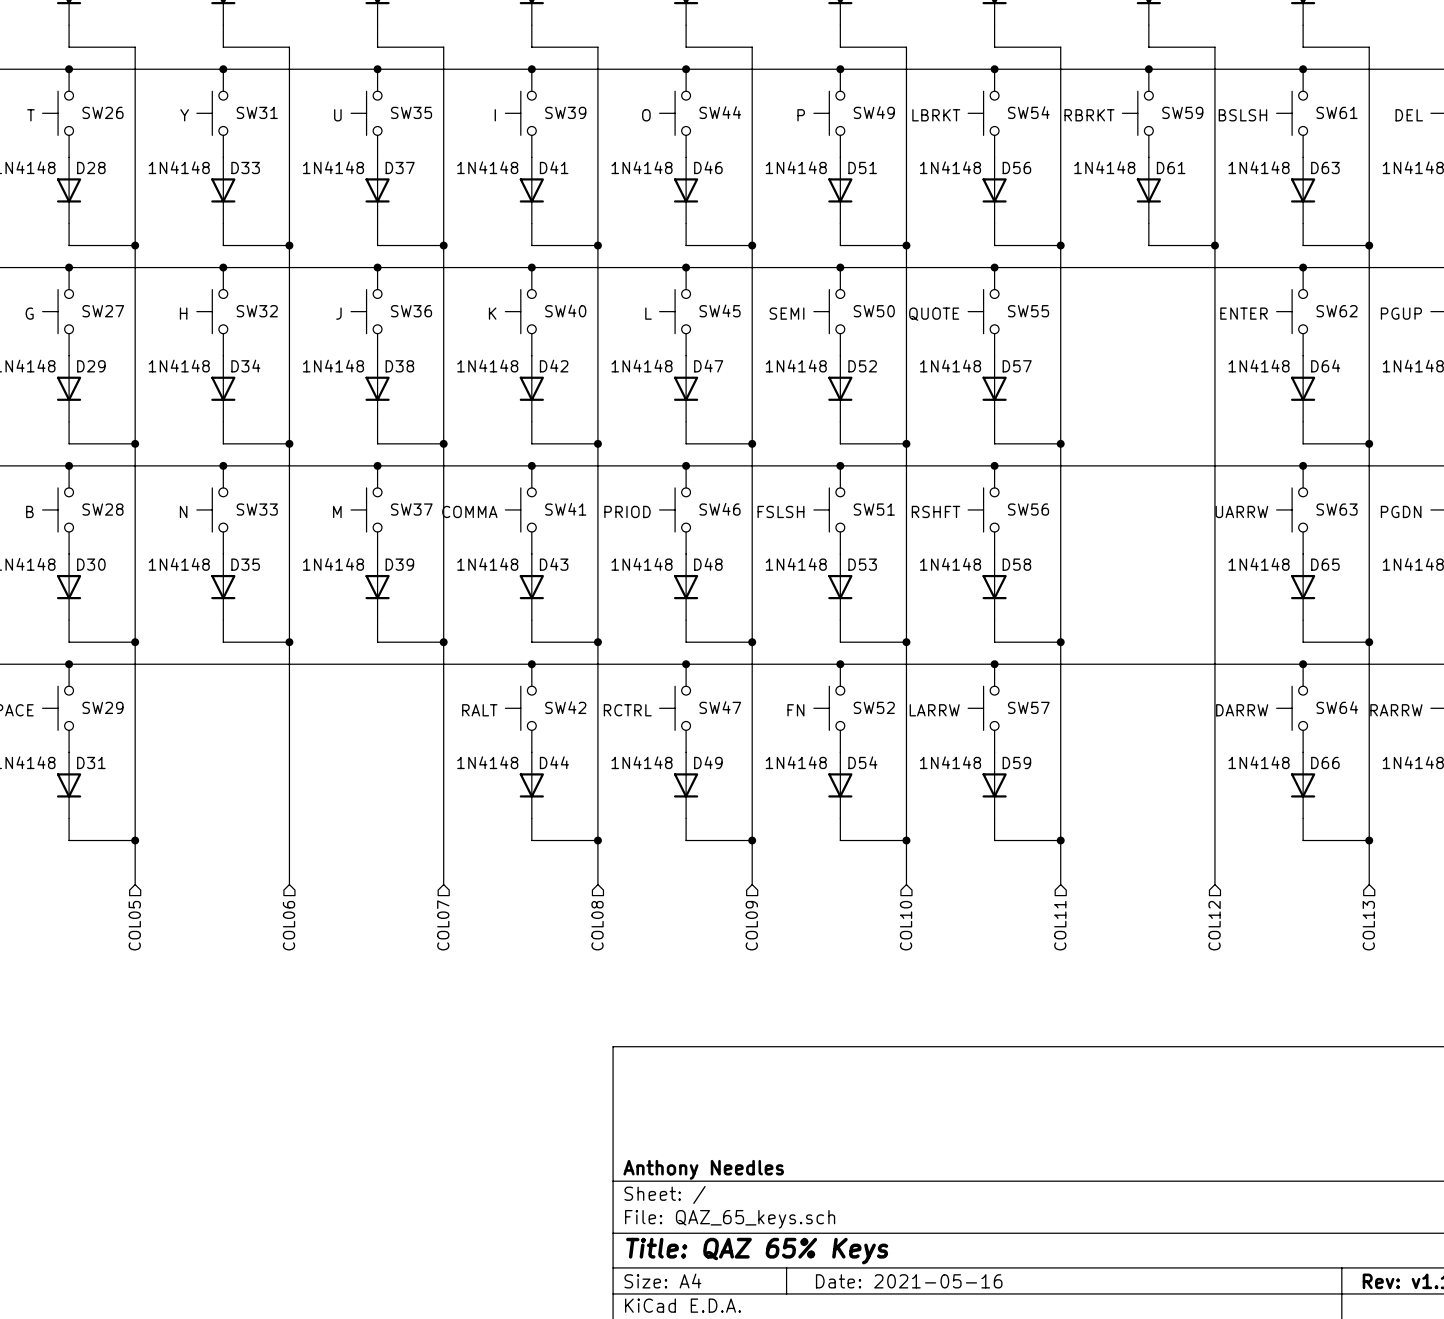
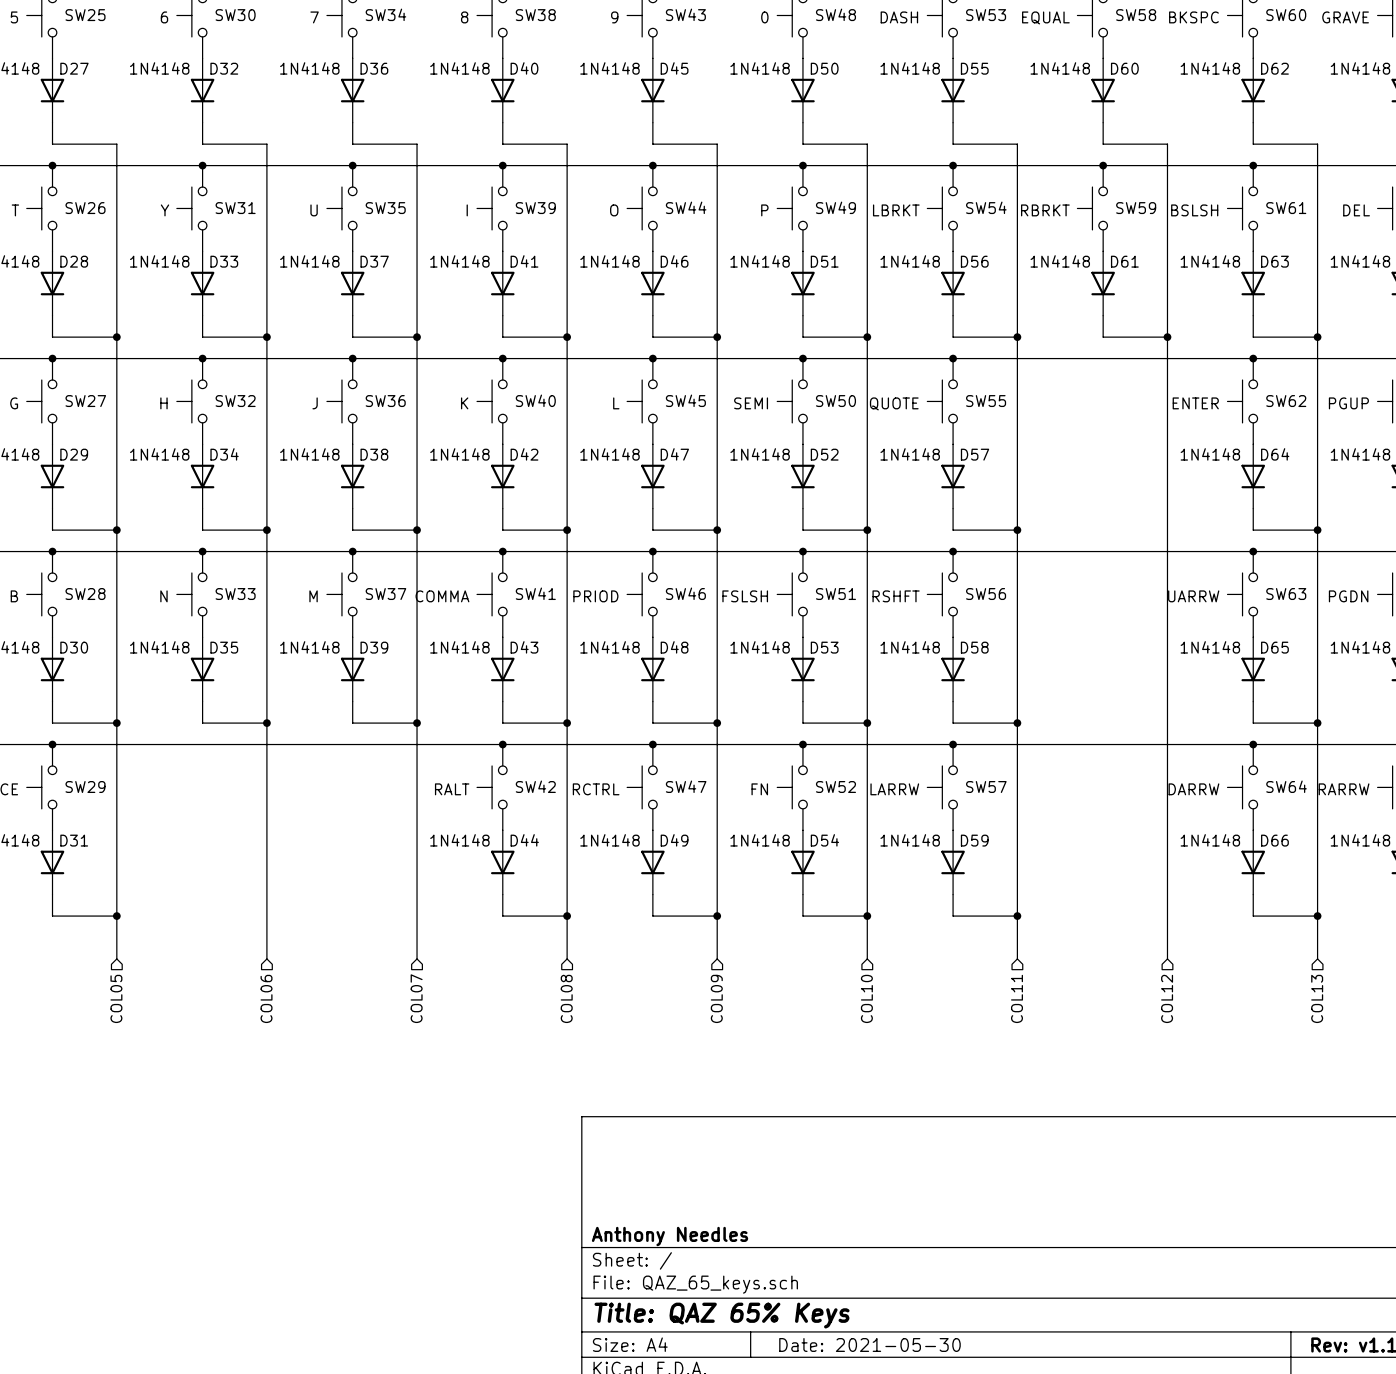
title block: Date: 2021-05-16 (909, 1281) -> Date: 2021-05-30 (869, 1344)

